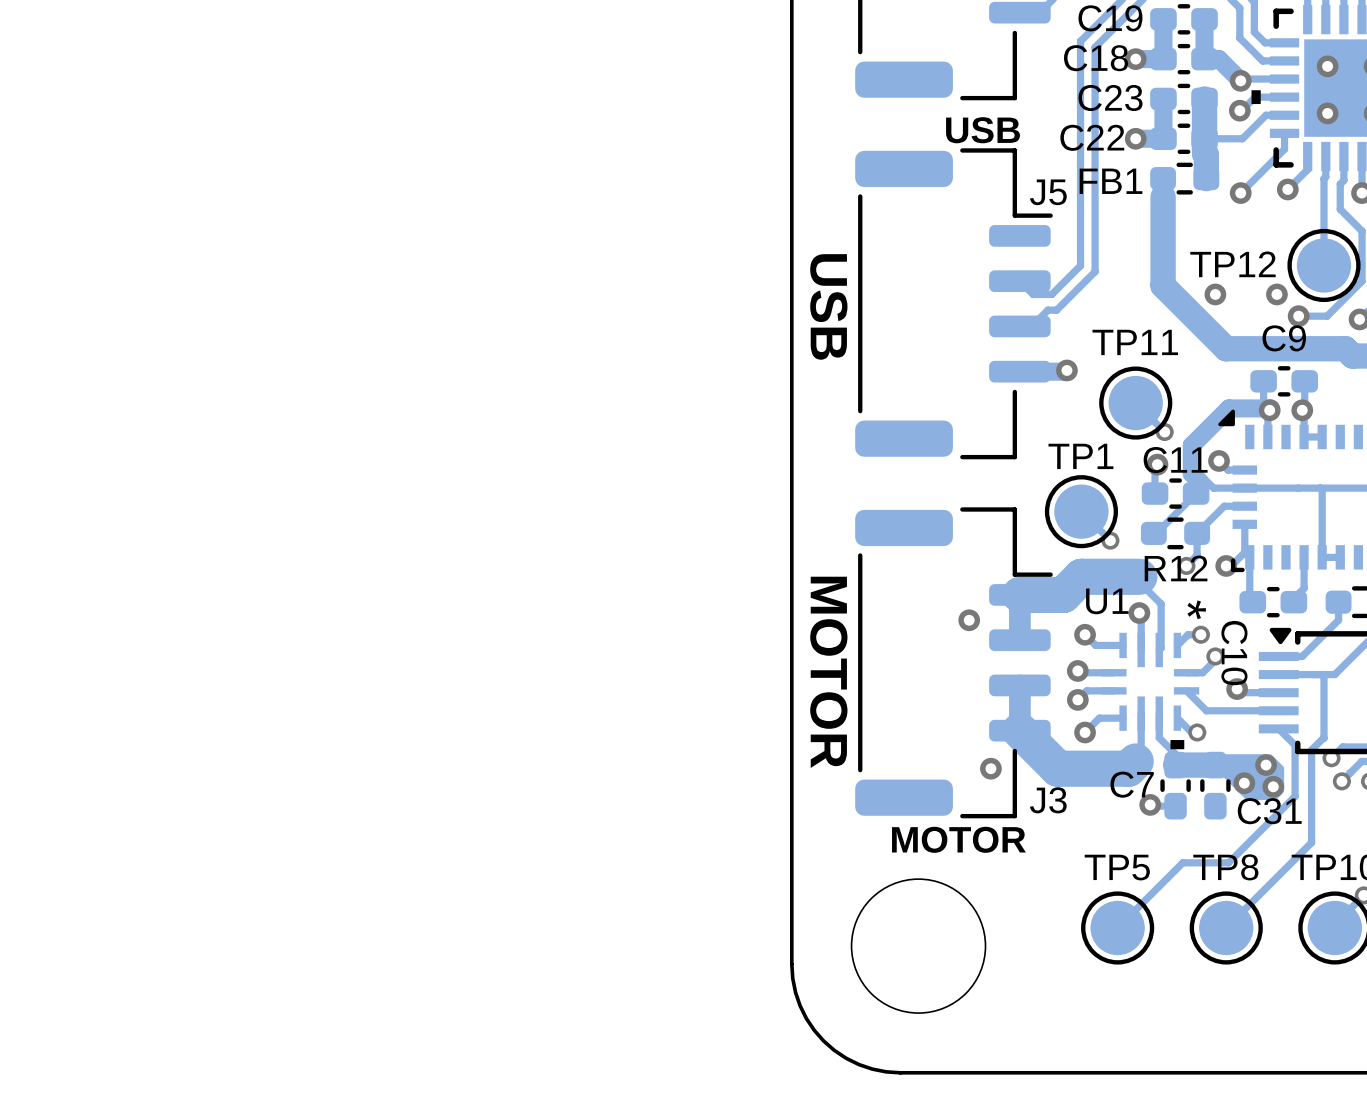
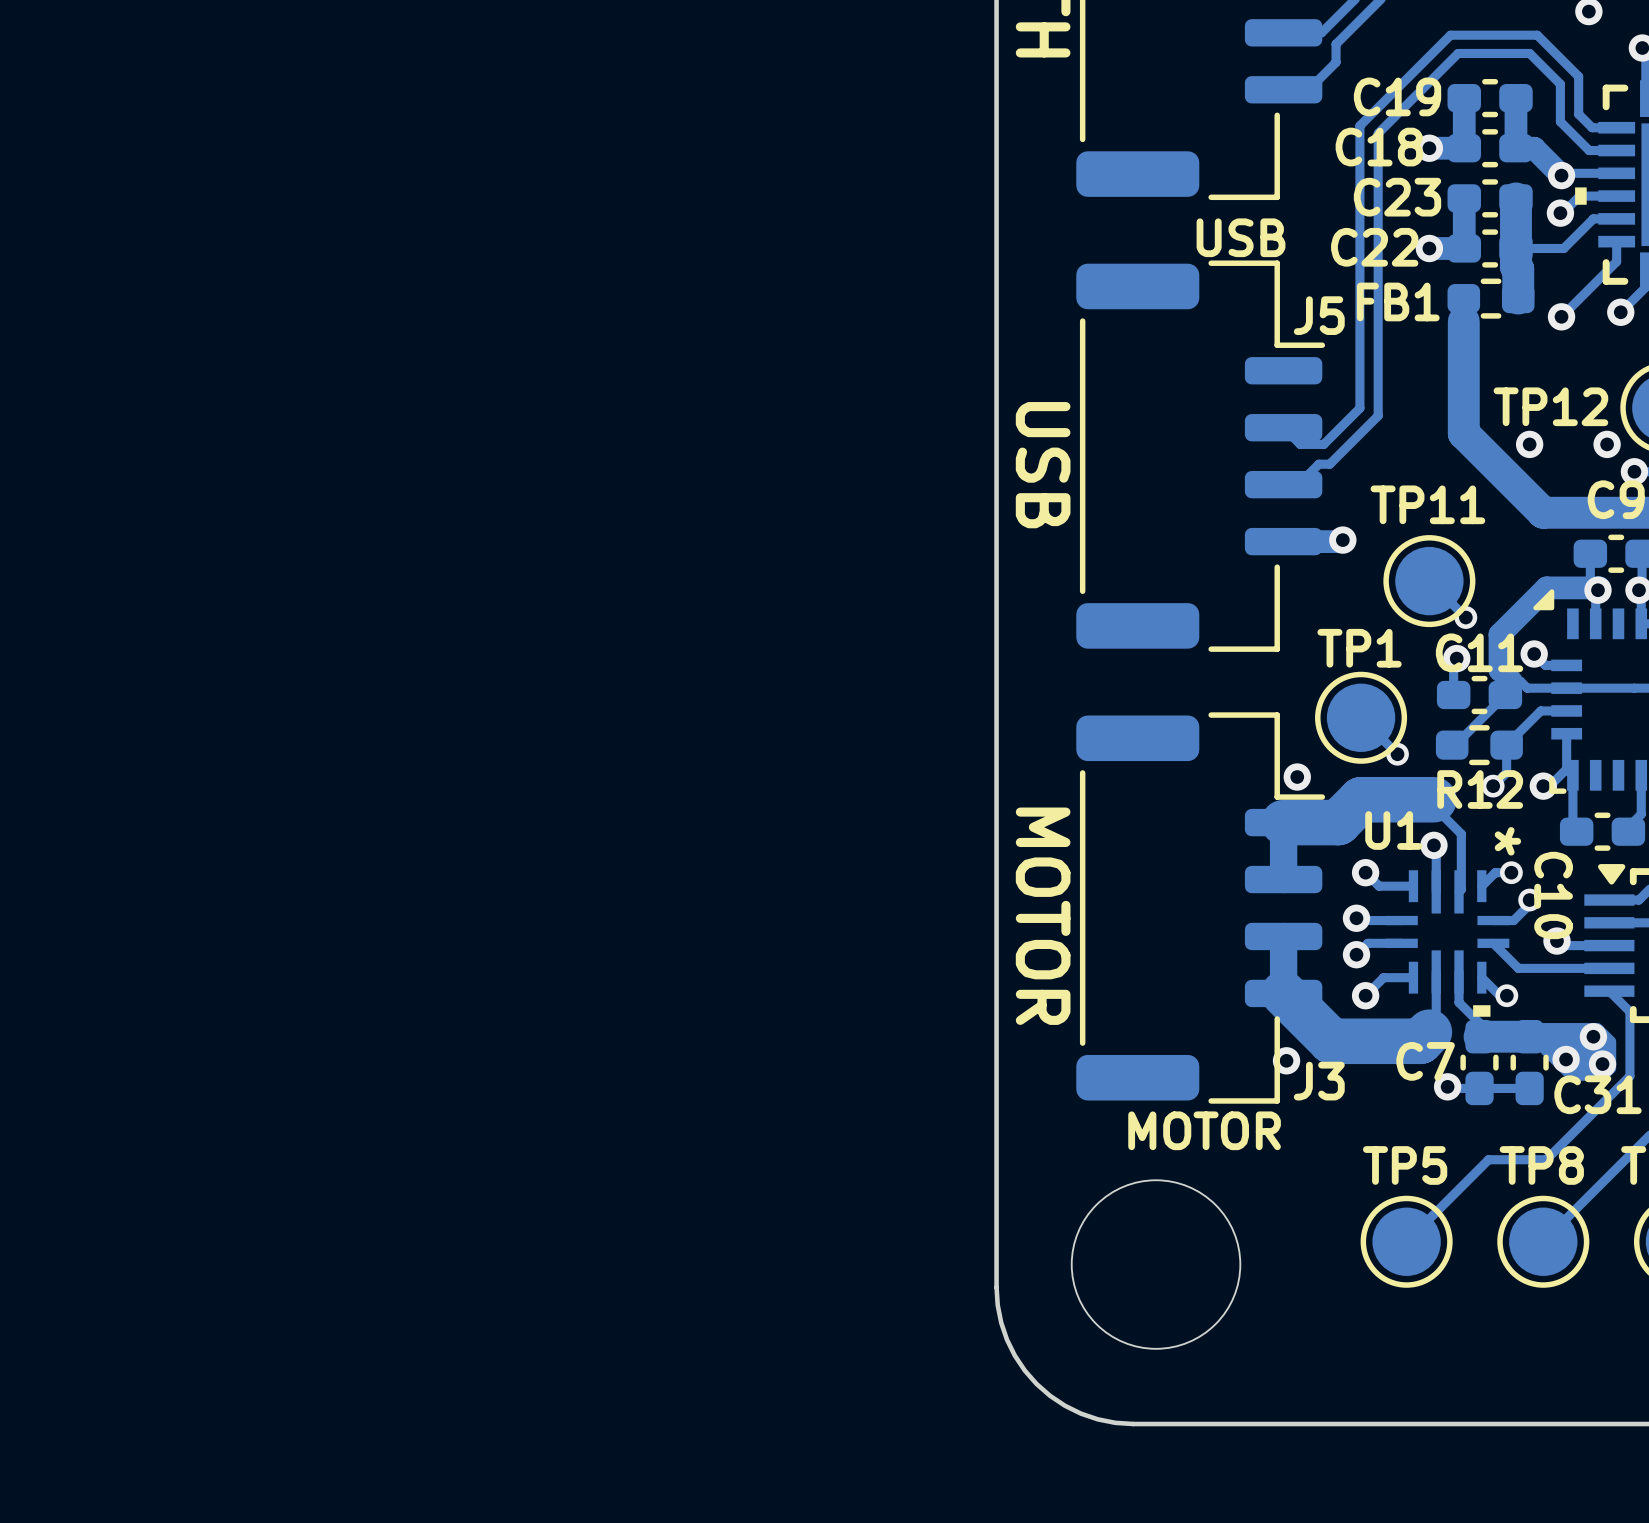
via: none -> (1297, 777)
via: (969, 620) -> none
via position: (990, 768) -> (1286, 1060)
track: none -> (1529, 1088) (1479, 1088)

